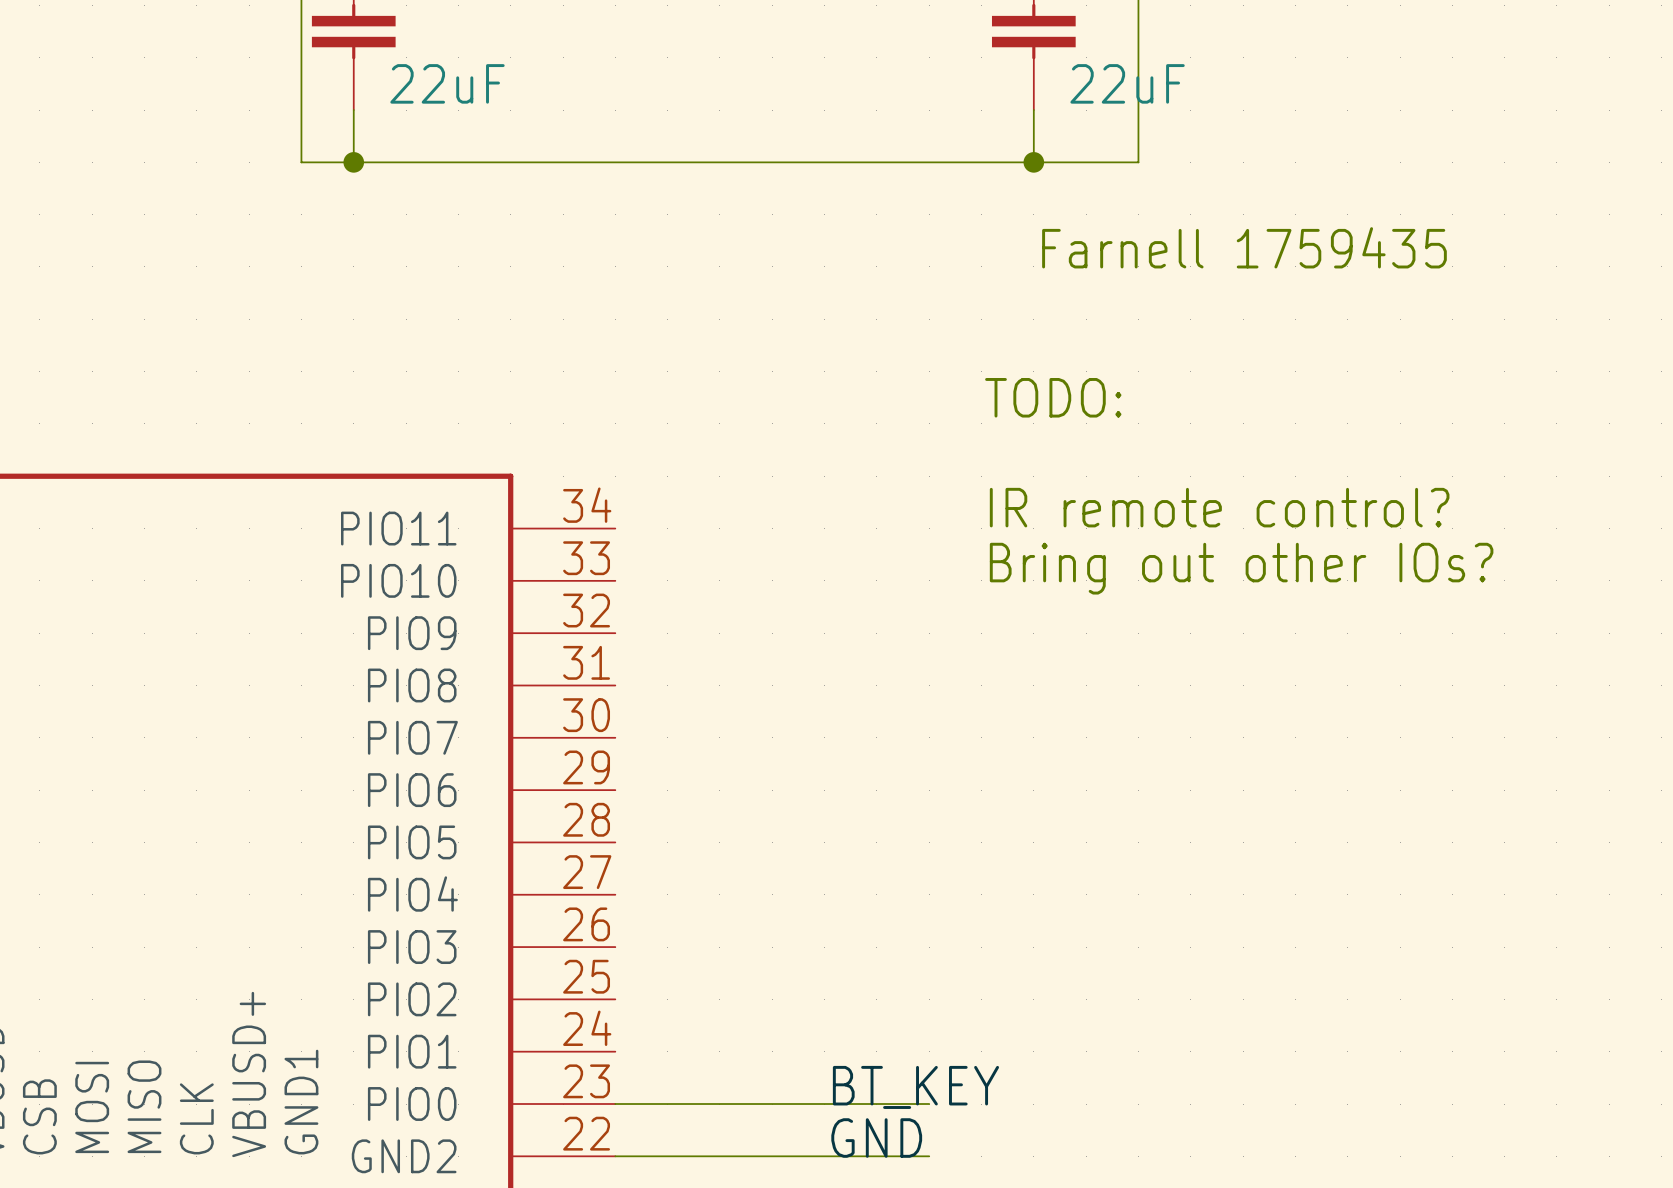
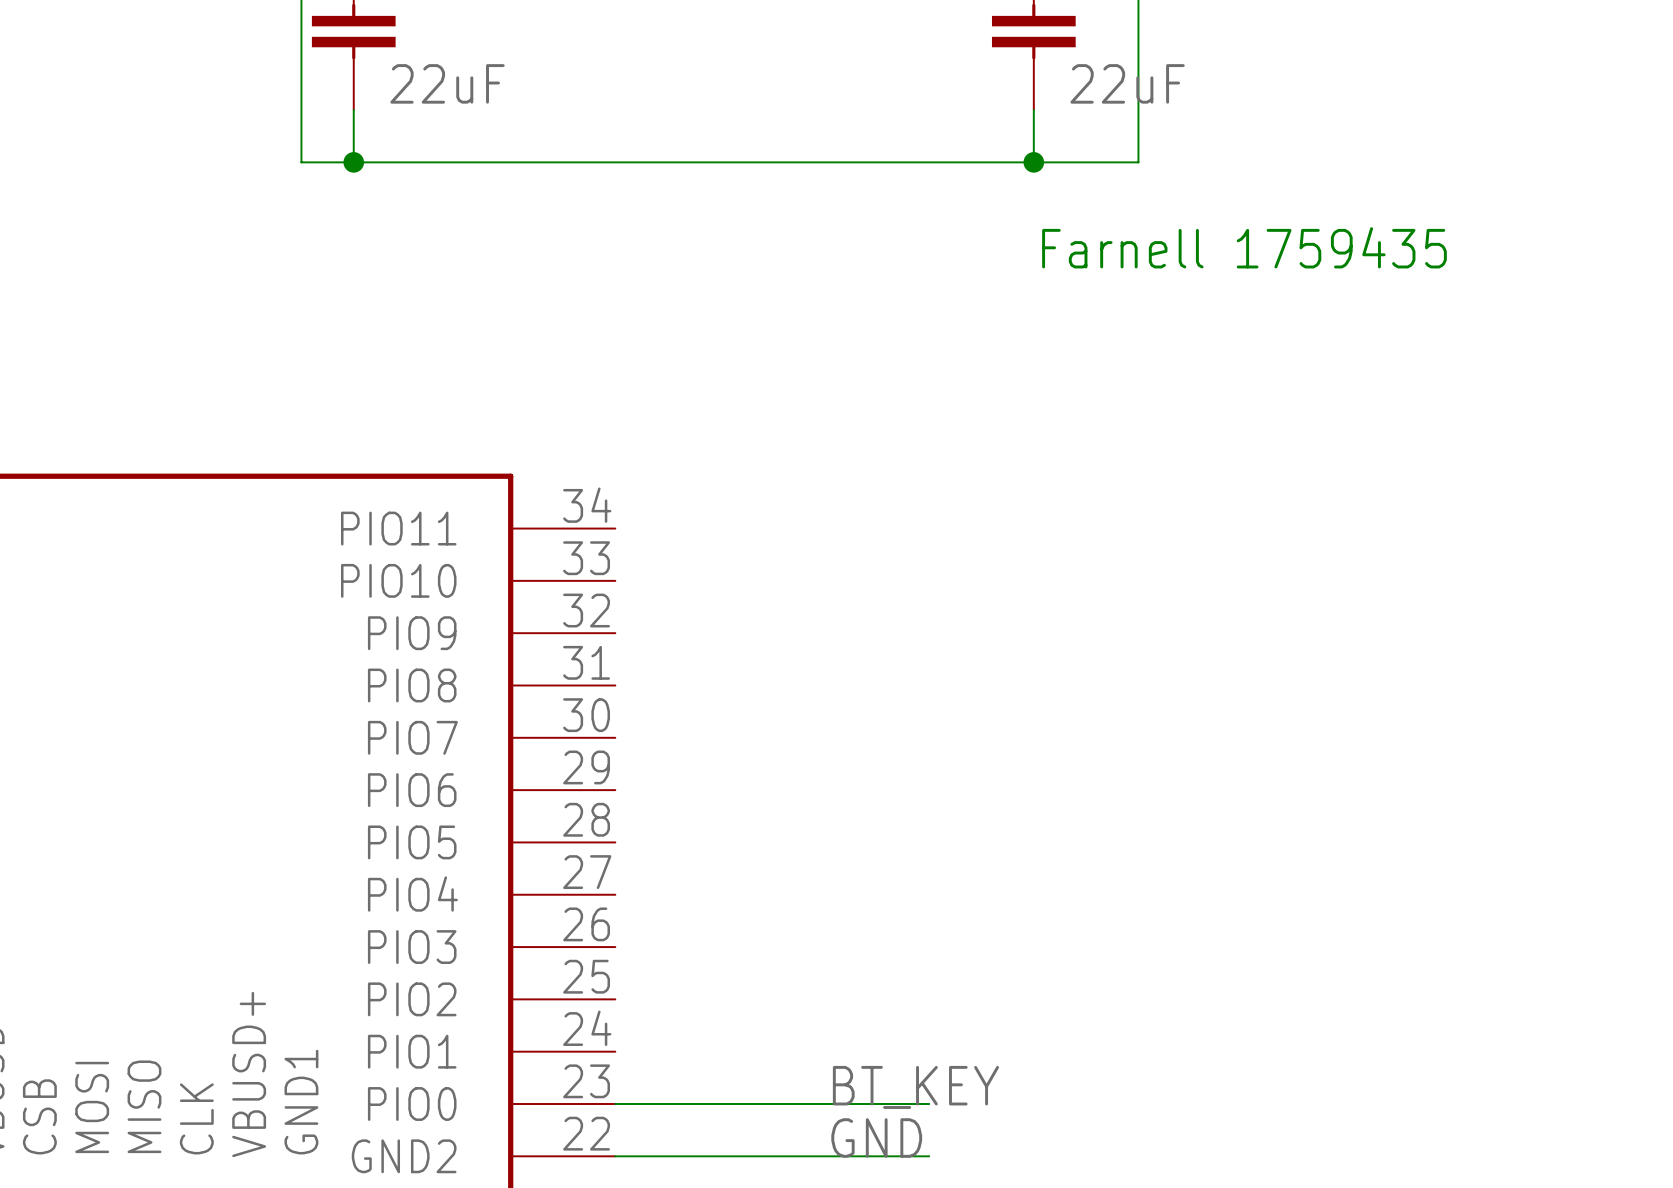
text: TODO: (1053, 397) -> none
text: IR remote control? (1219, 507) -> none
text: Bring out other IOs? (1241, 568) -> none

